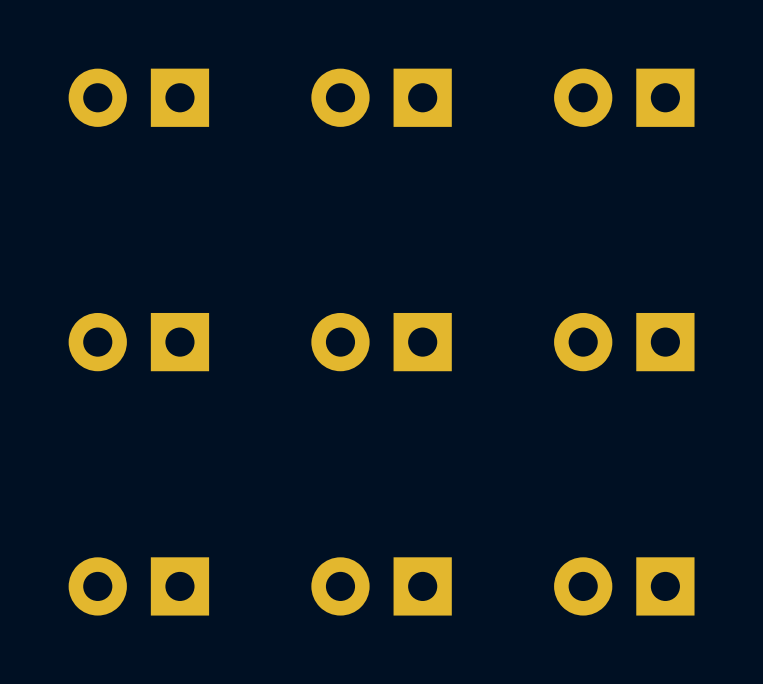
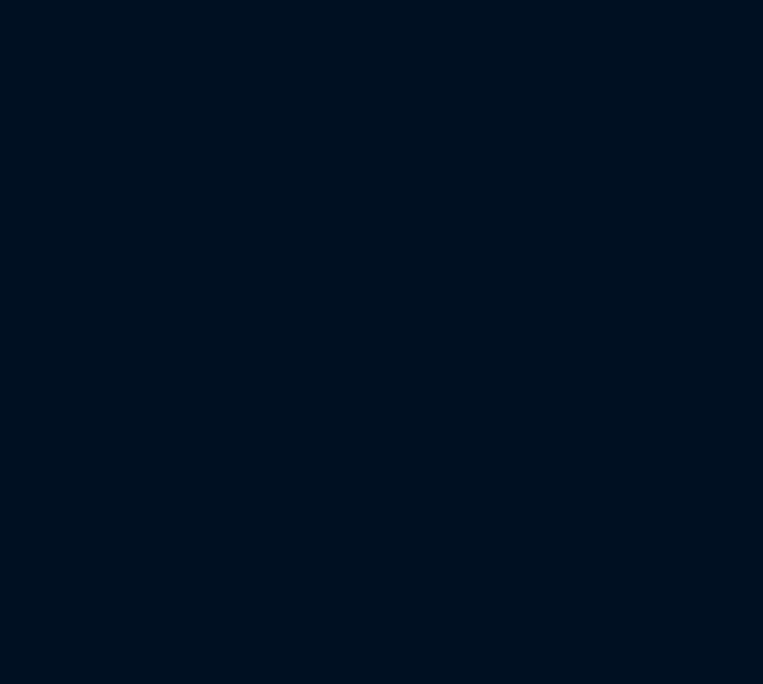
part: (138, 97) -> none
part: (381, 97) -> none
part: (624, 97) -> none
part: (138, 342) -> none
part: (381, 342) -> none
part: (624, 342) -> none
part: (138, 586) -> none
part: (381, 586) -> none
part: (624, 586) -> none

